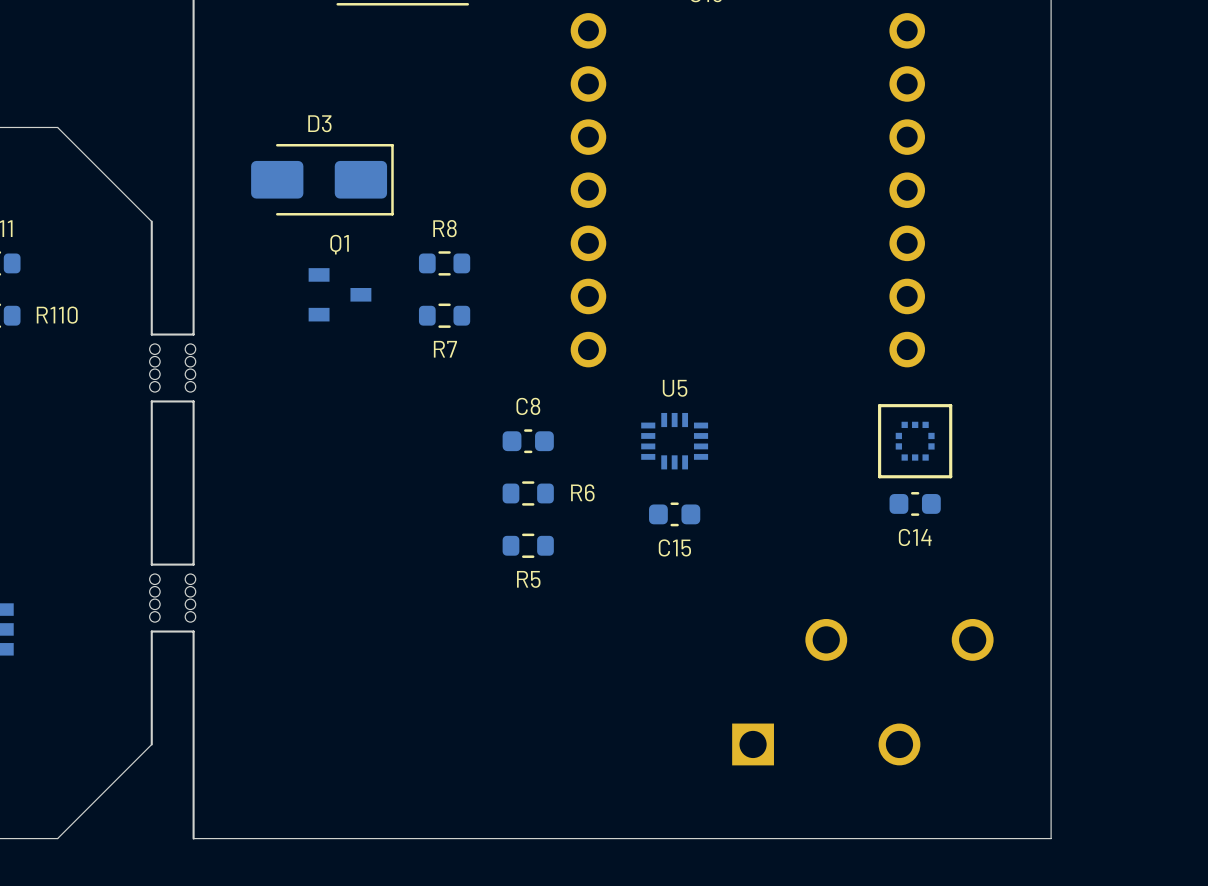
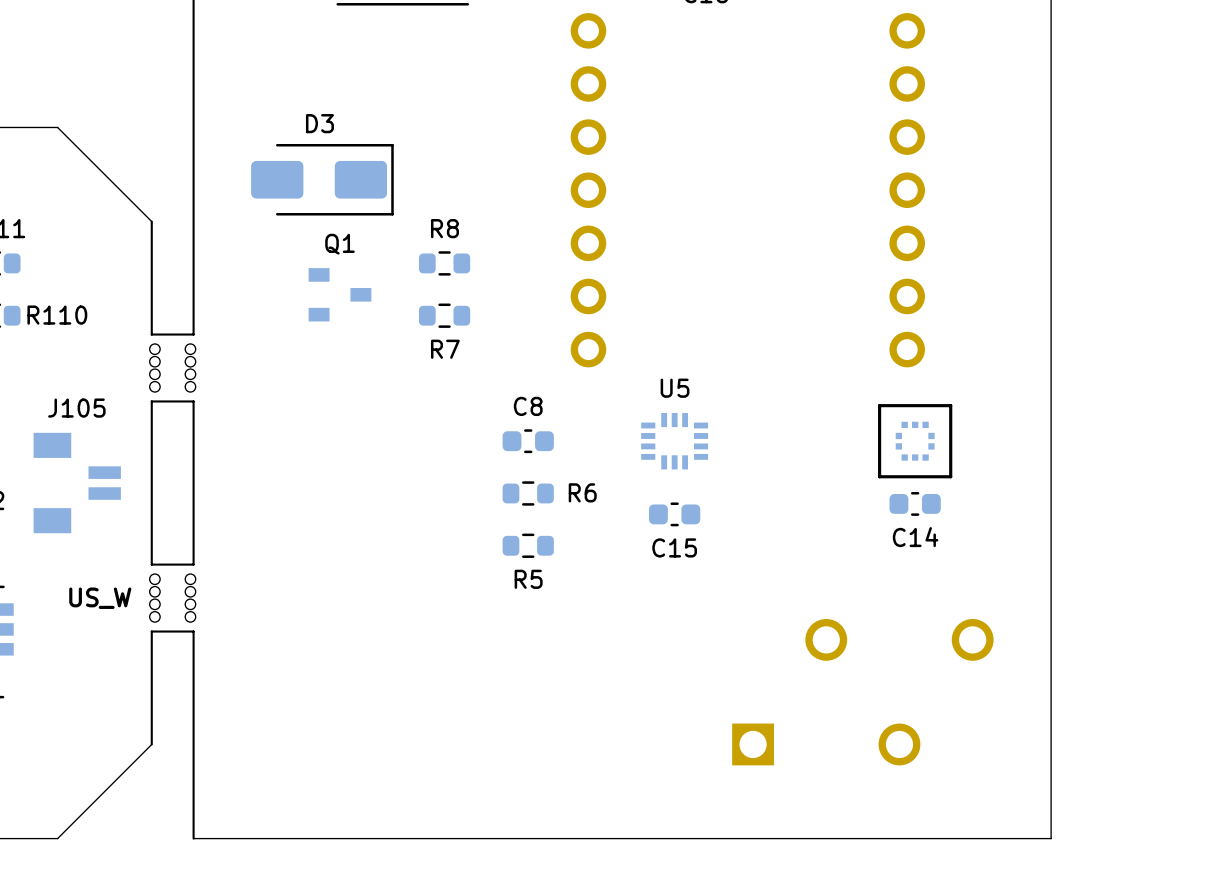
J105: none -> (77, 483)
text: none -> US_W (100, 598)

